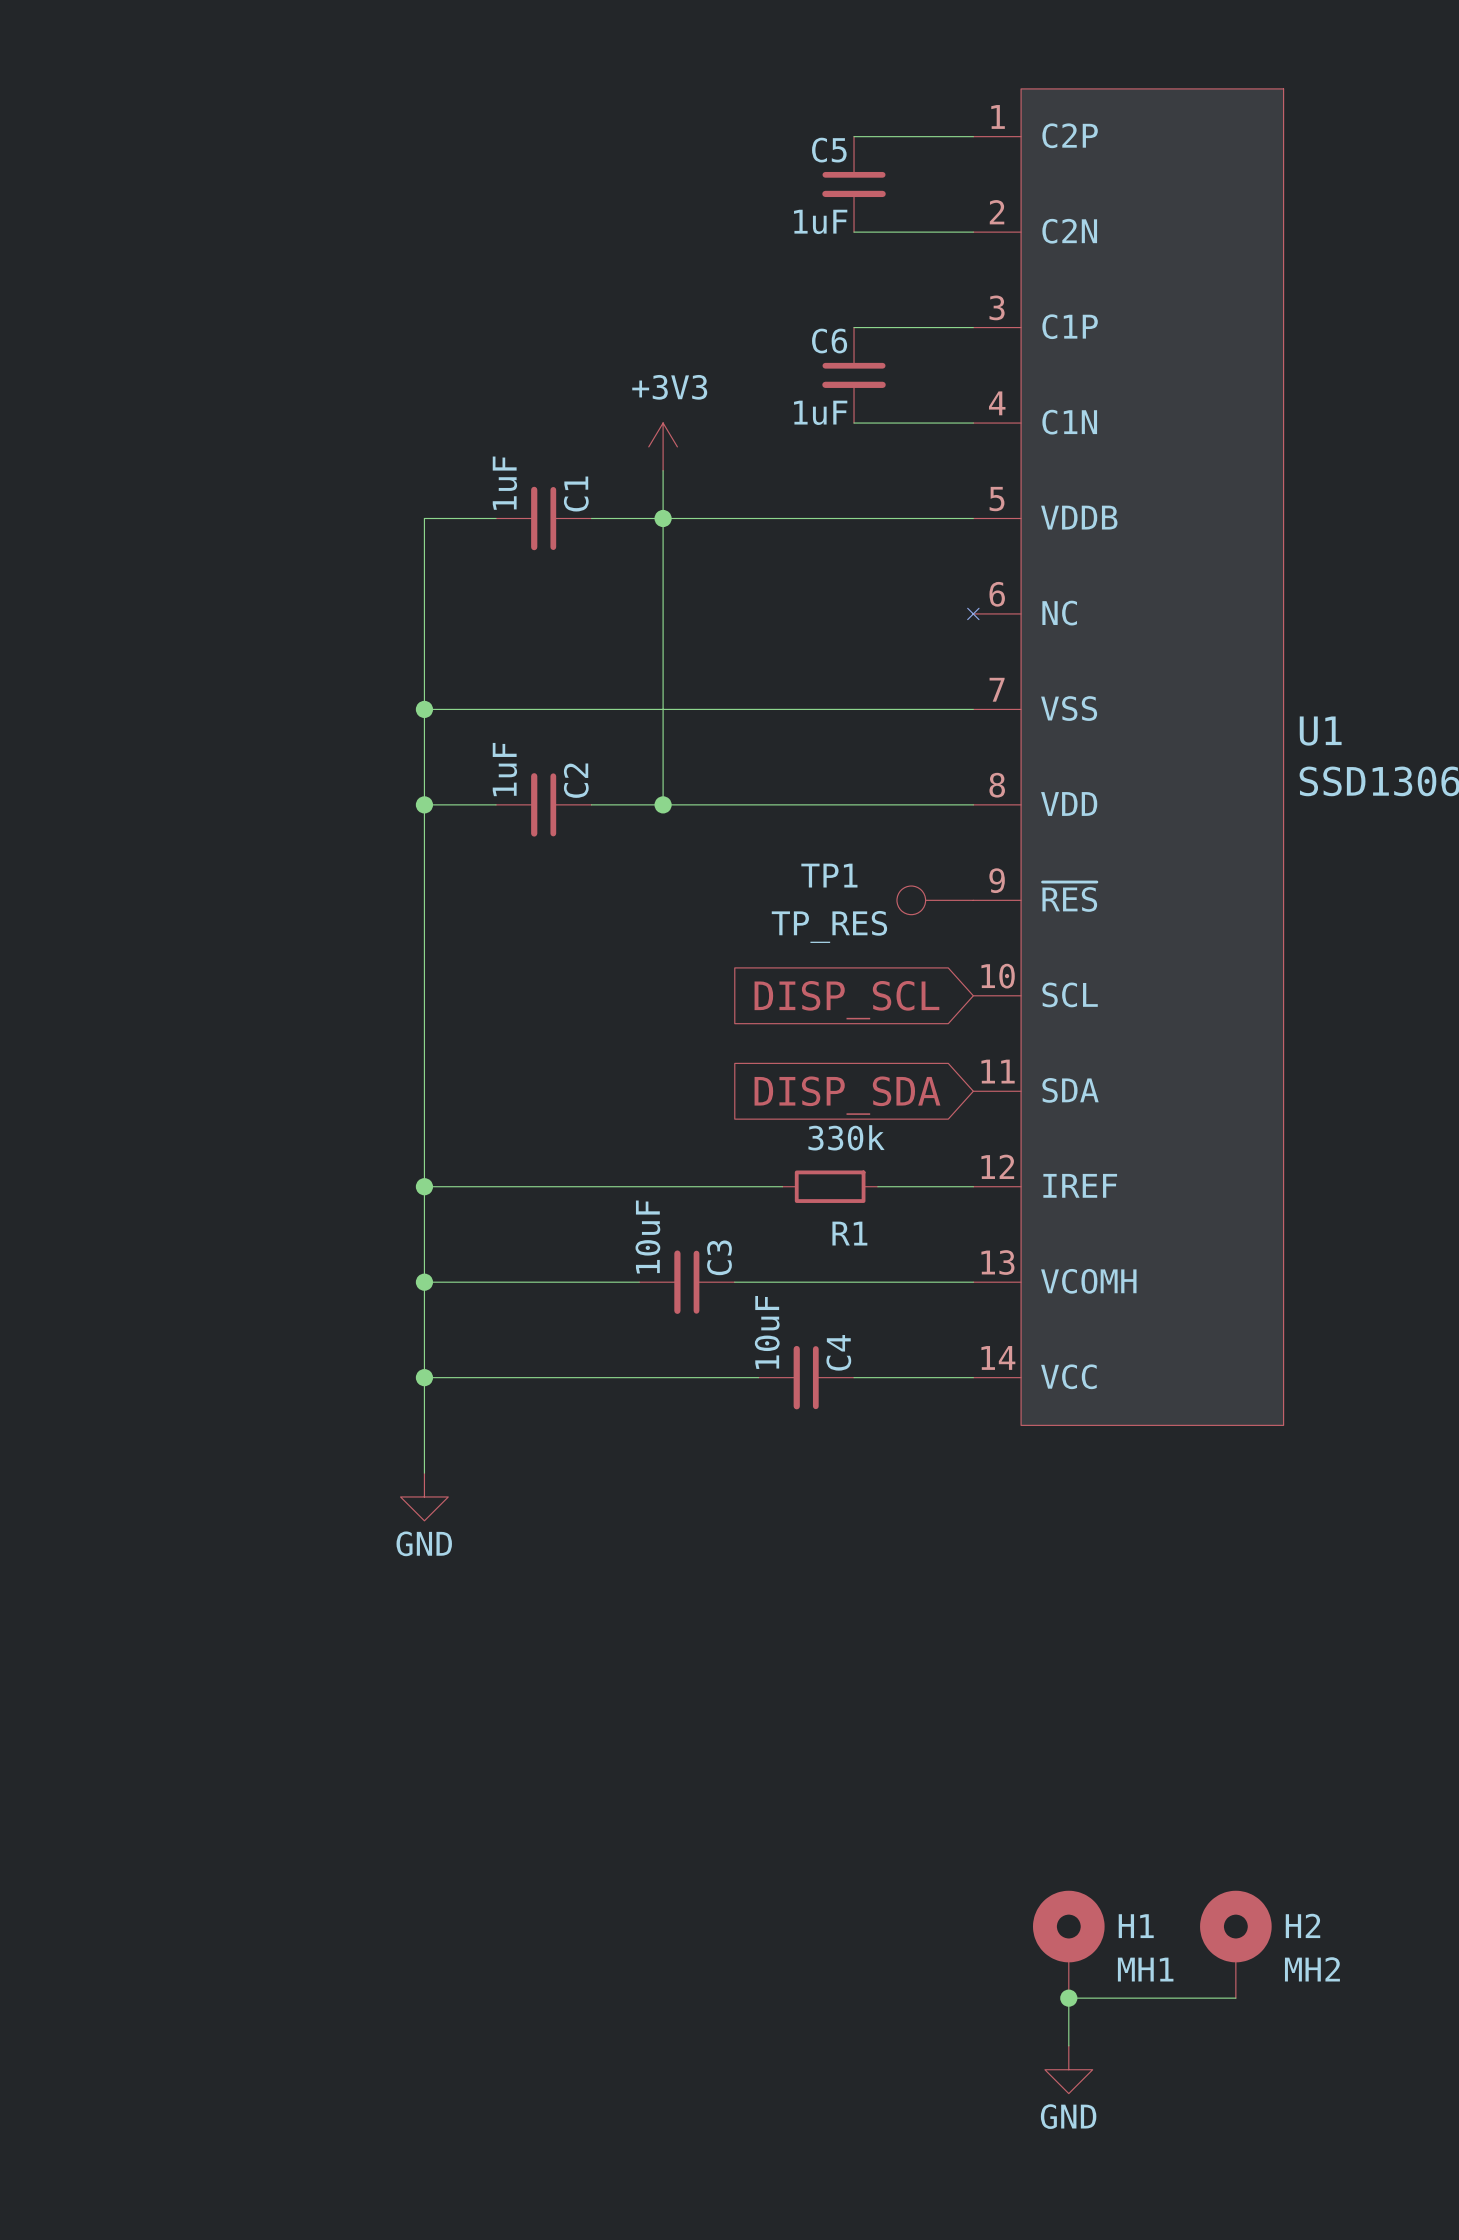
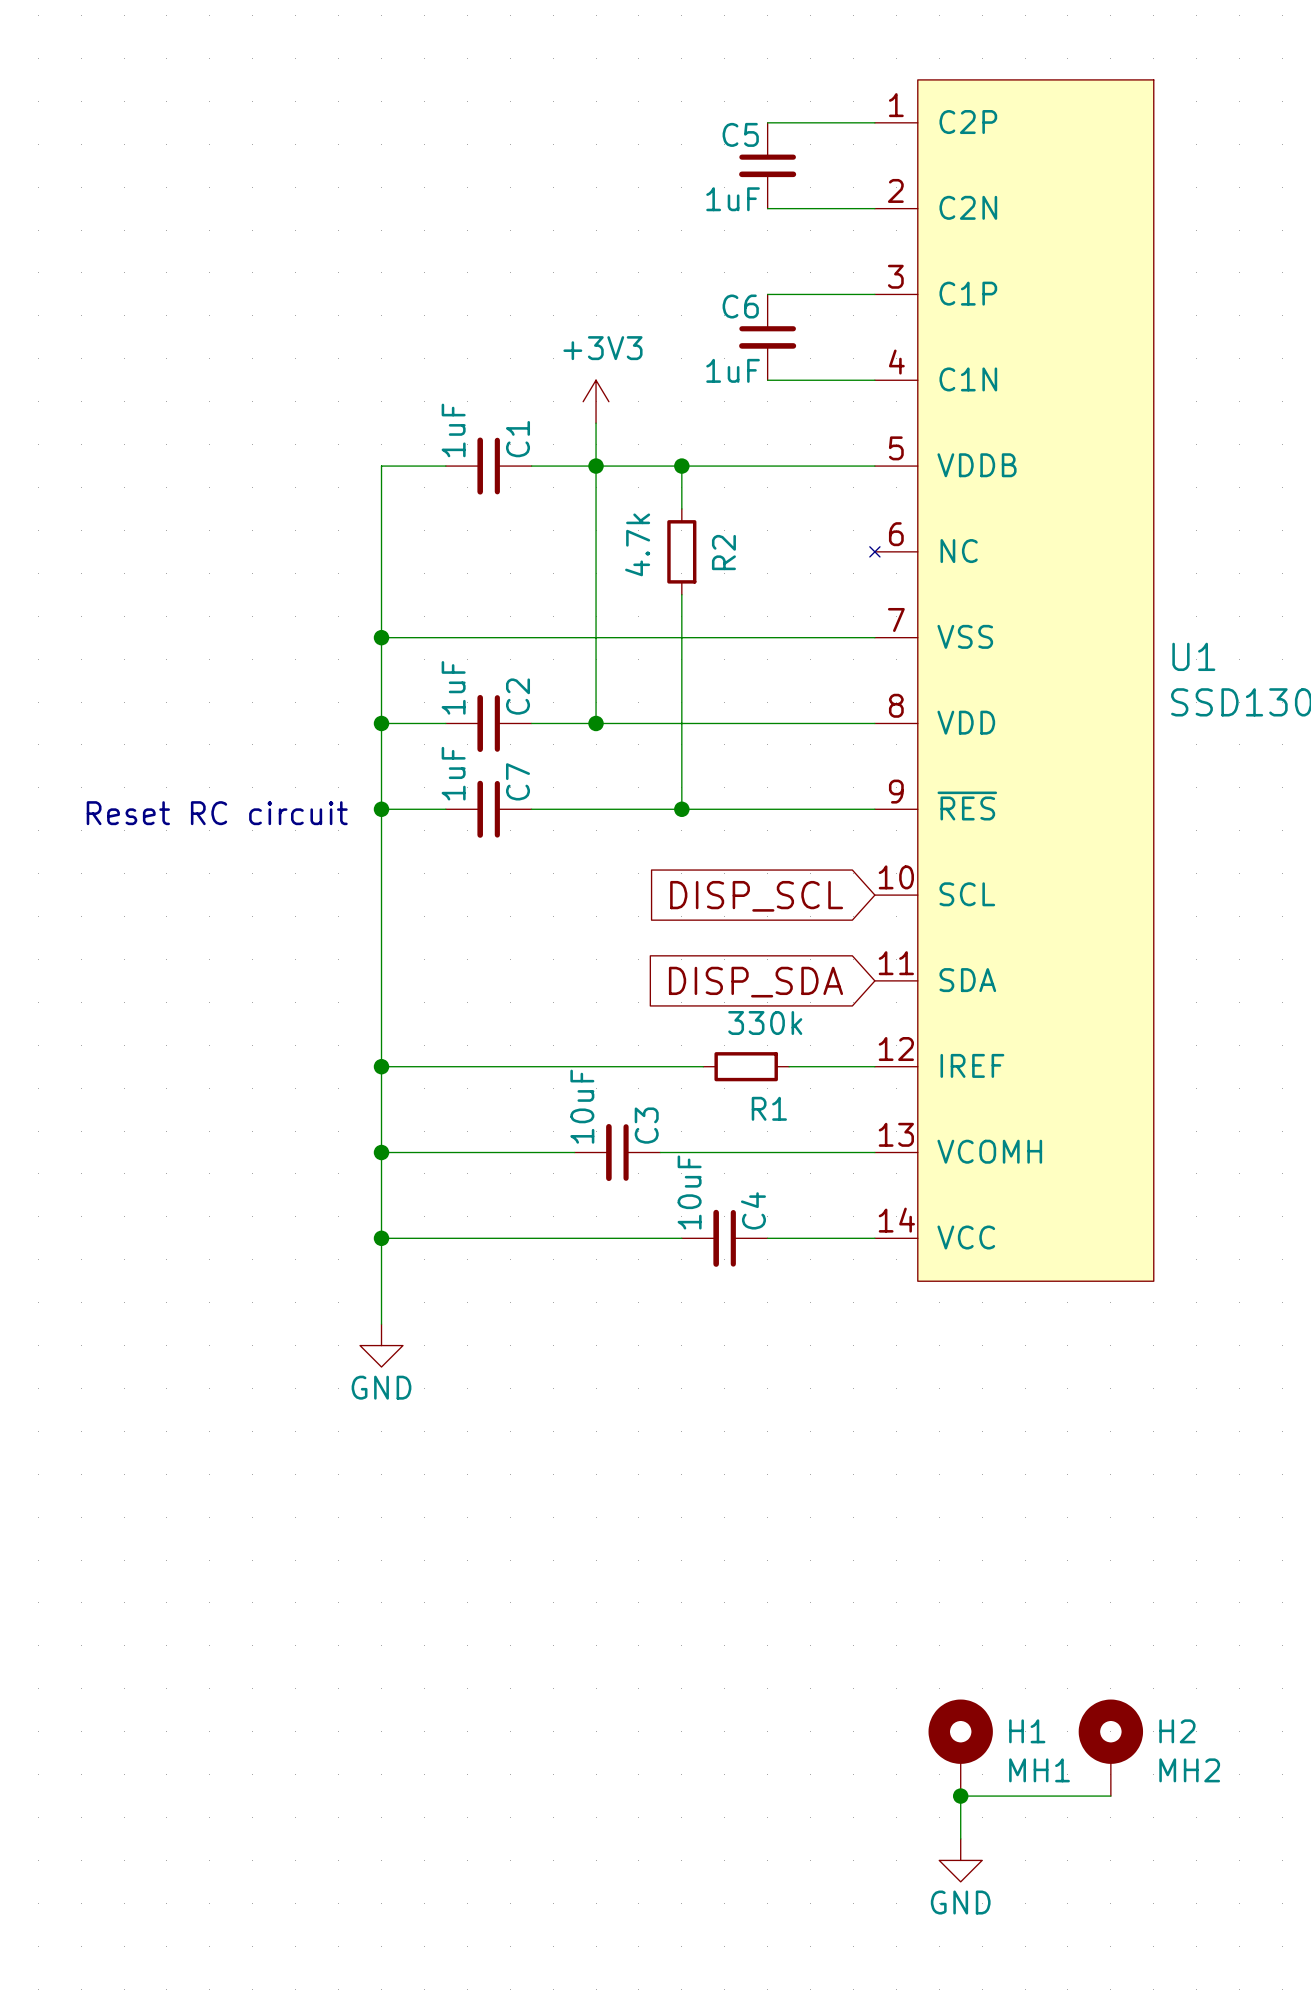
wire: none -> (681, 466) (681, 508)
junction: none -> (681, 466)
R2: none -> 4.7k (681, 551)
wire: none -> (681, 594) (681, 809)
wire: none -> (381, 809) (445, 809)
junction: none -> (381, 809)
C7: none -> 1uF (488, 809)
wire: none -> (531, 809) (874, 809)
junction: none -> (681, 809)
TP1: TP_RES (935, 900) -> none
text: none -> Reset RC circuit (217, 813)

